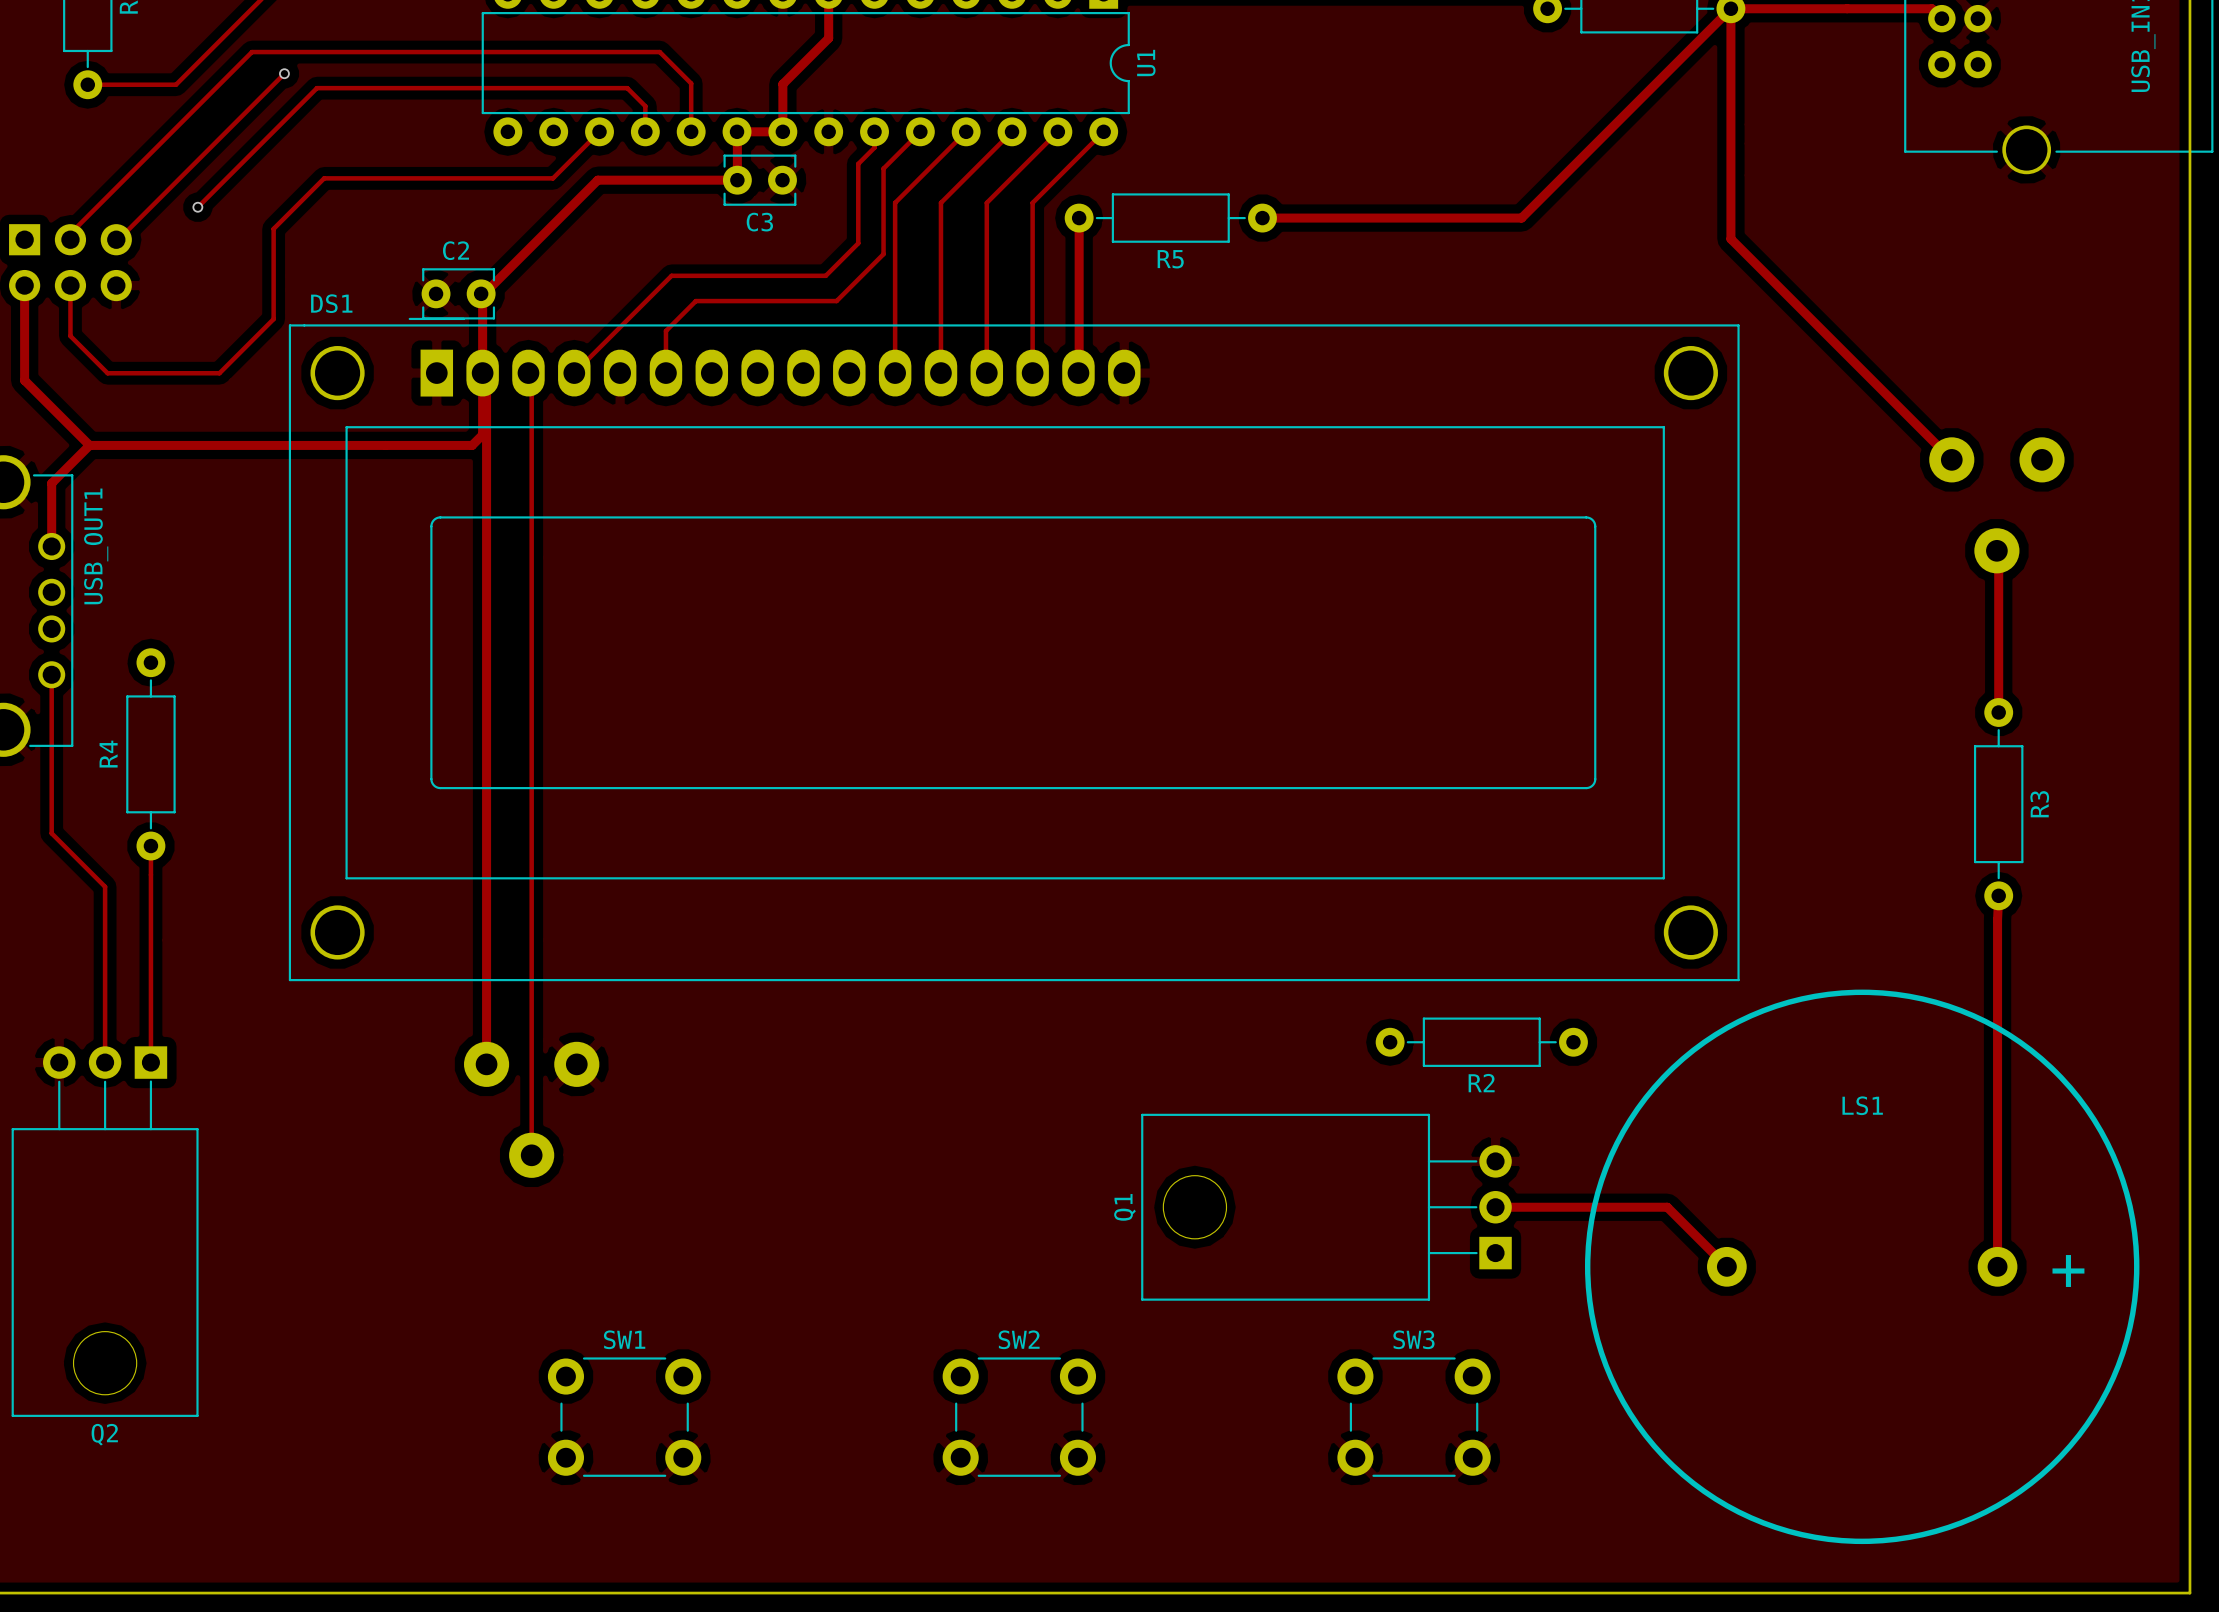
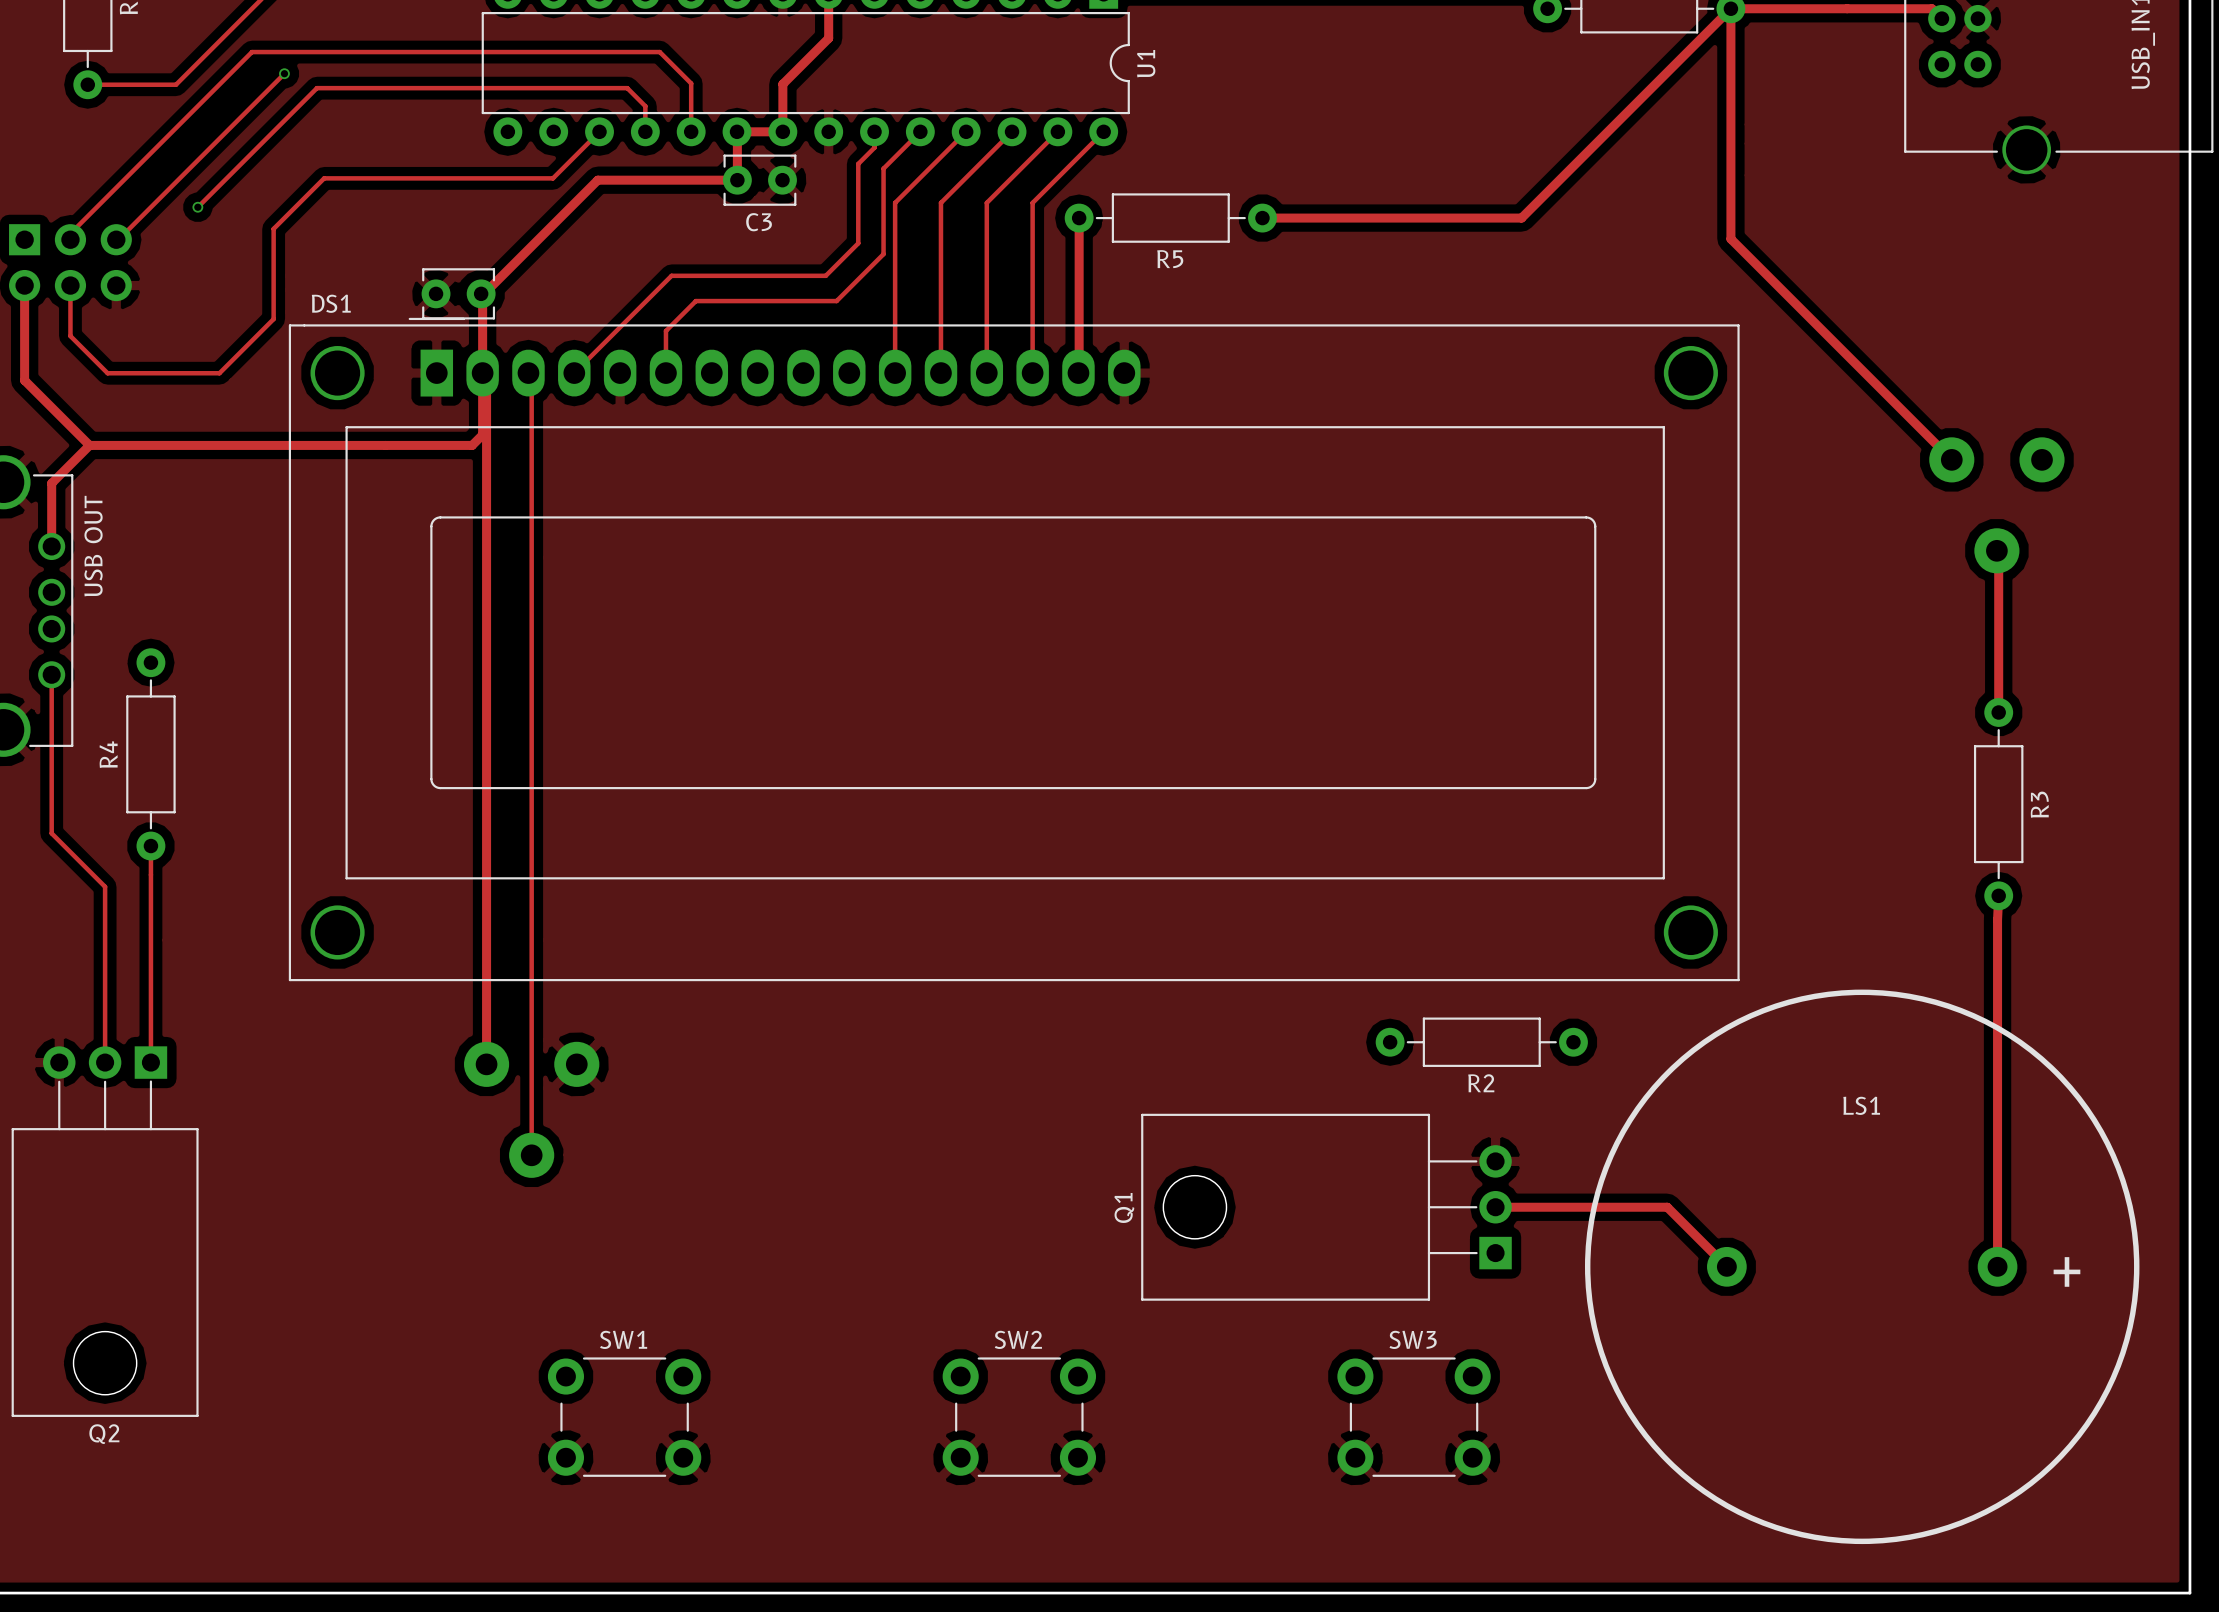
C2 name: C2 (456, 250) -> none
USB_OUT1 name: USB_OUT1 (96, 546) -> USB OUT (93, 546)

